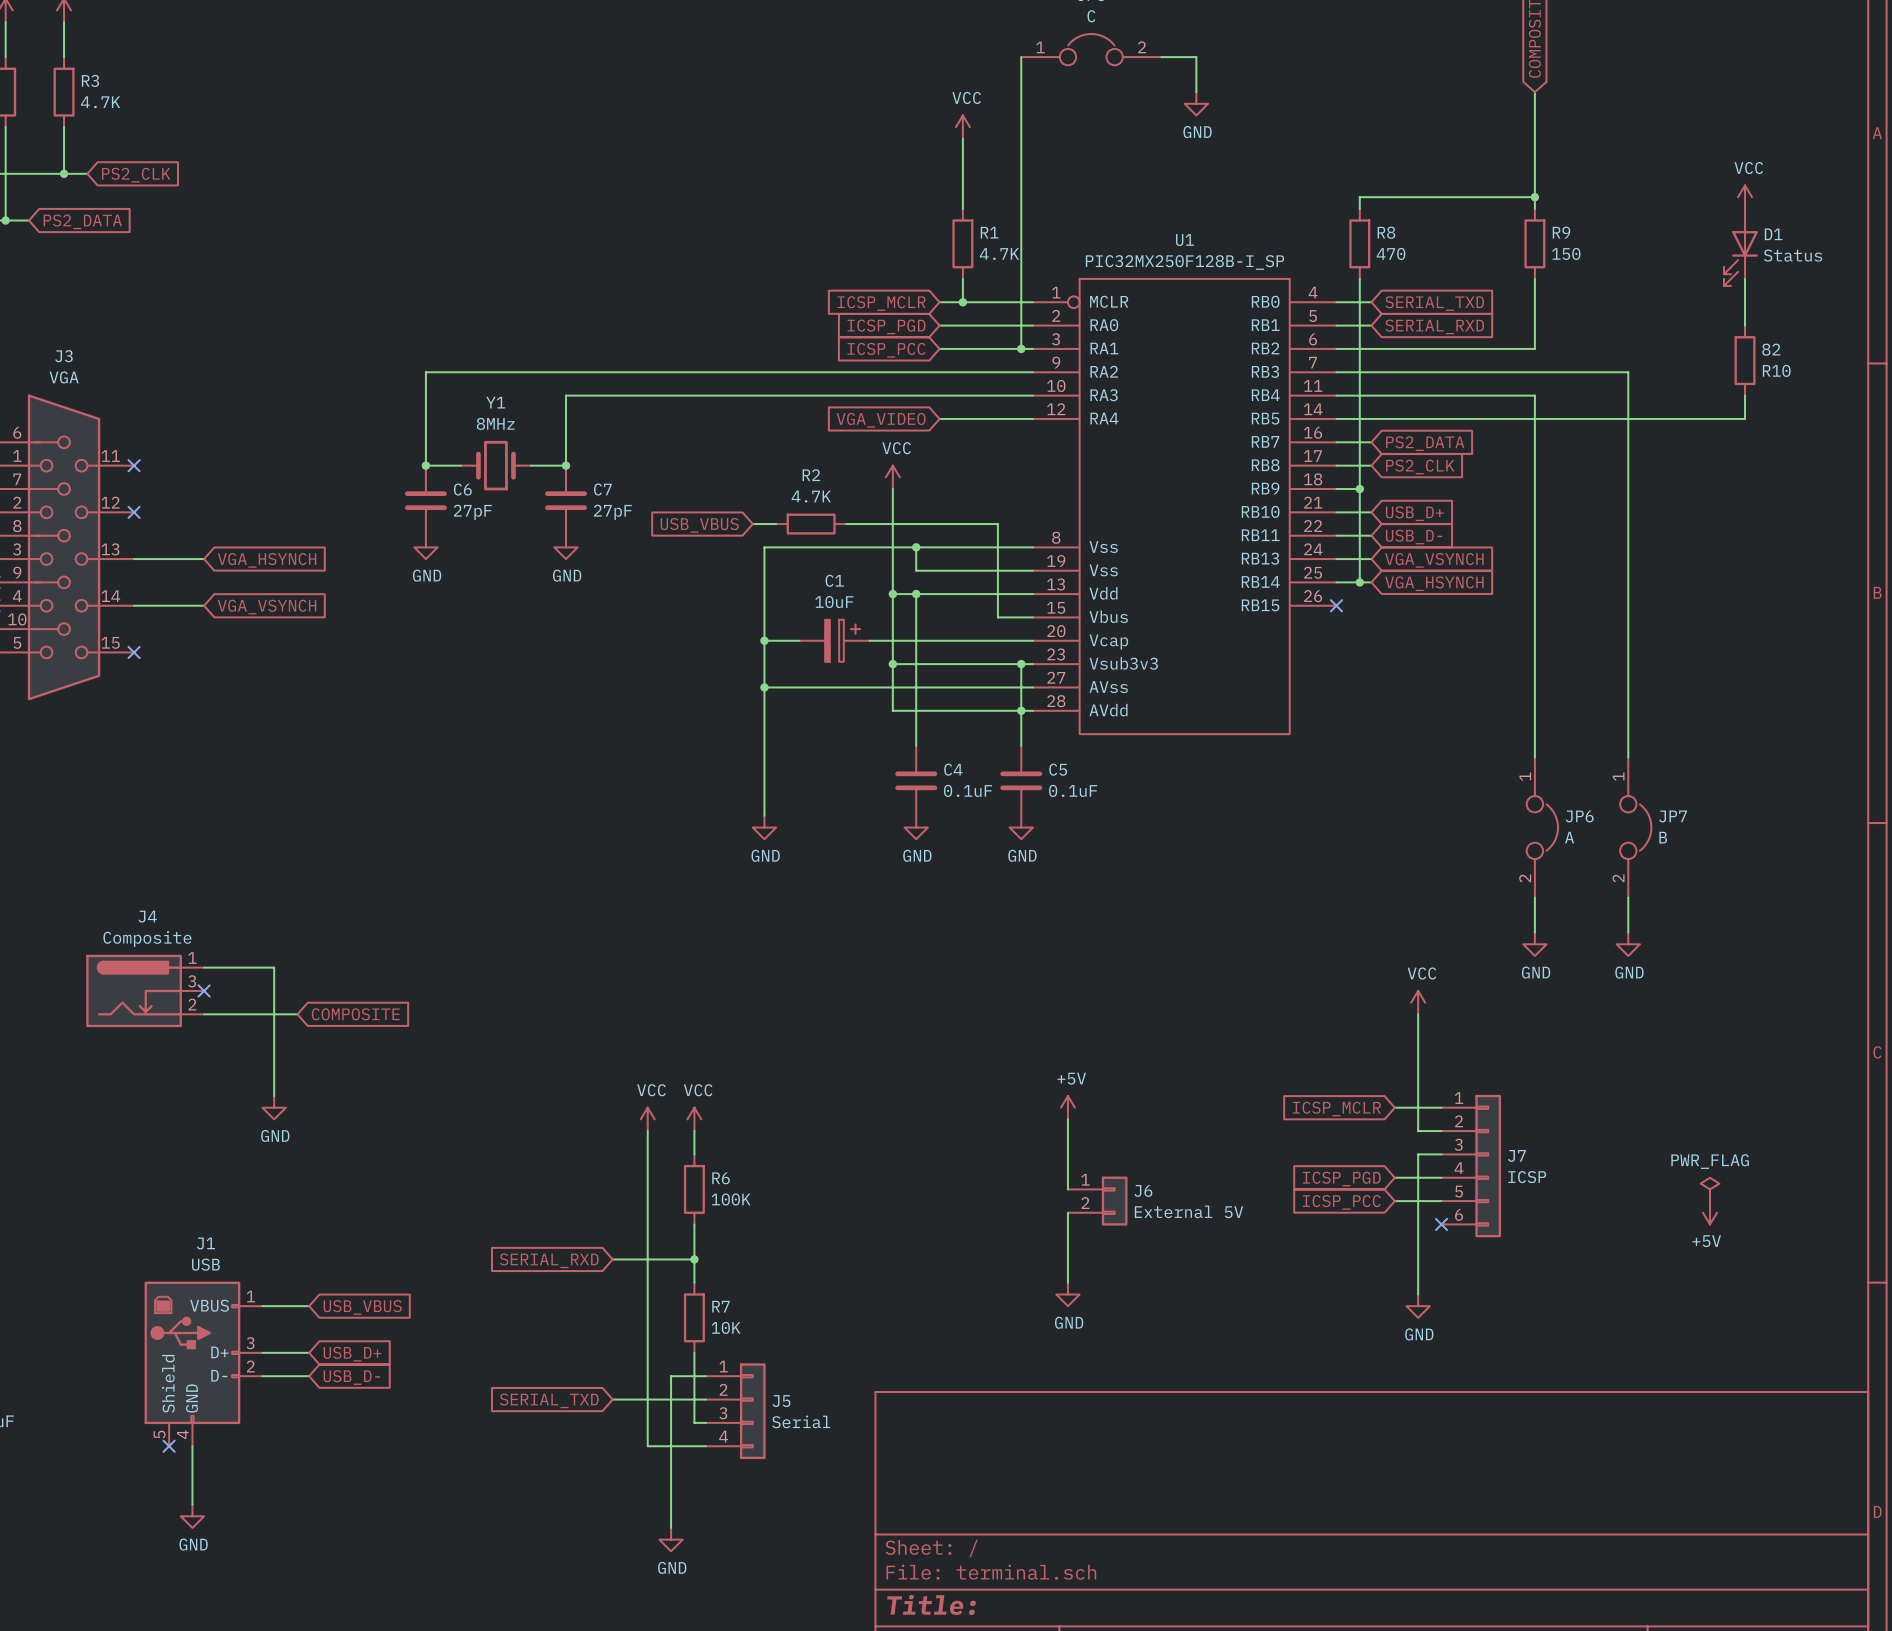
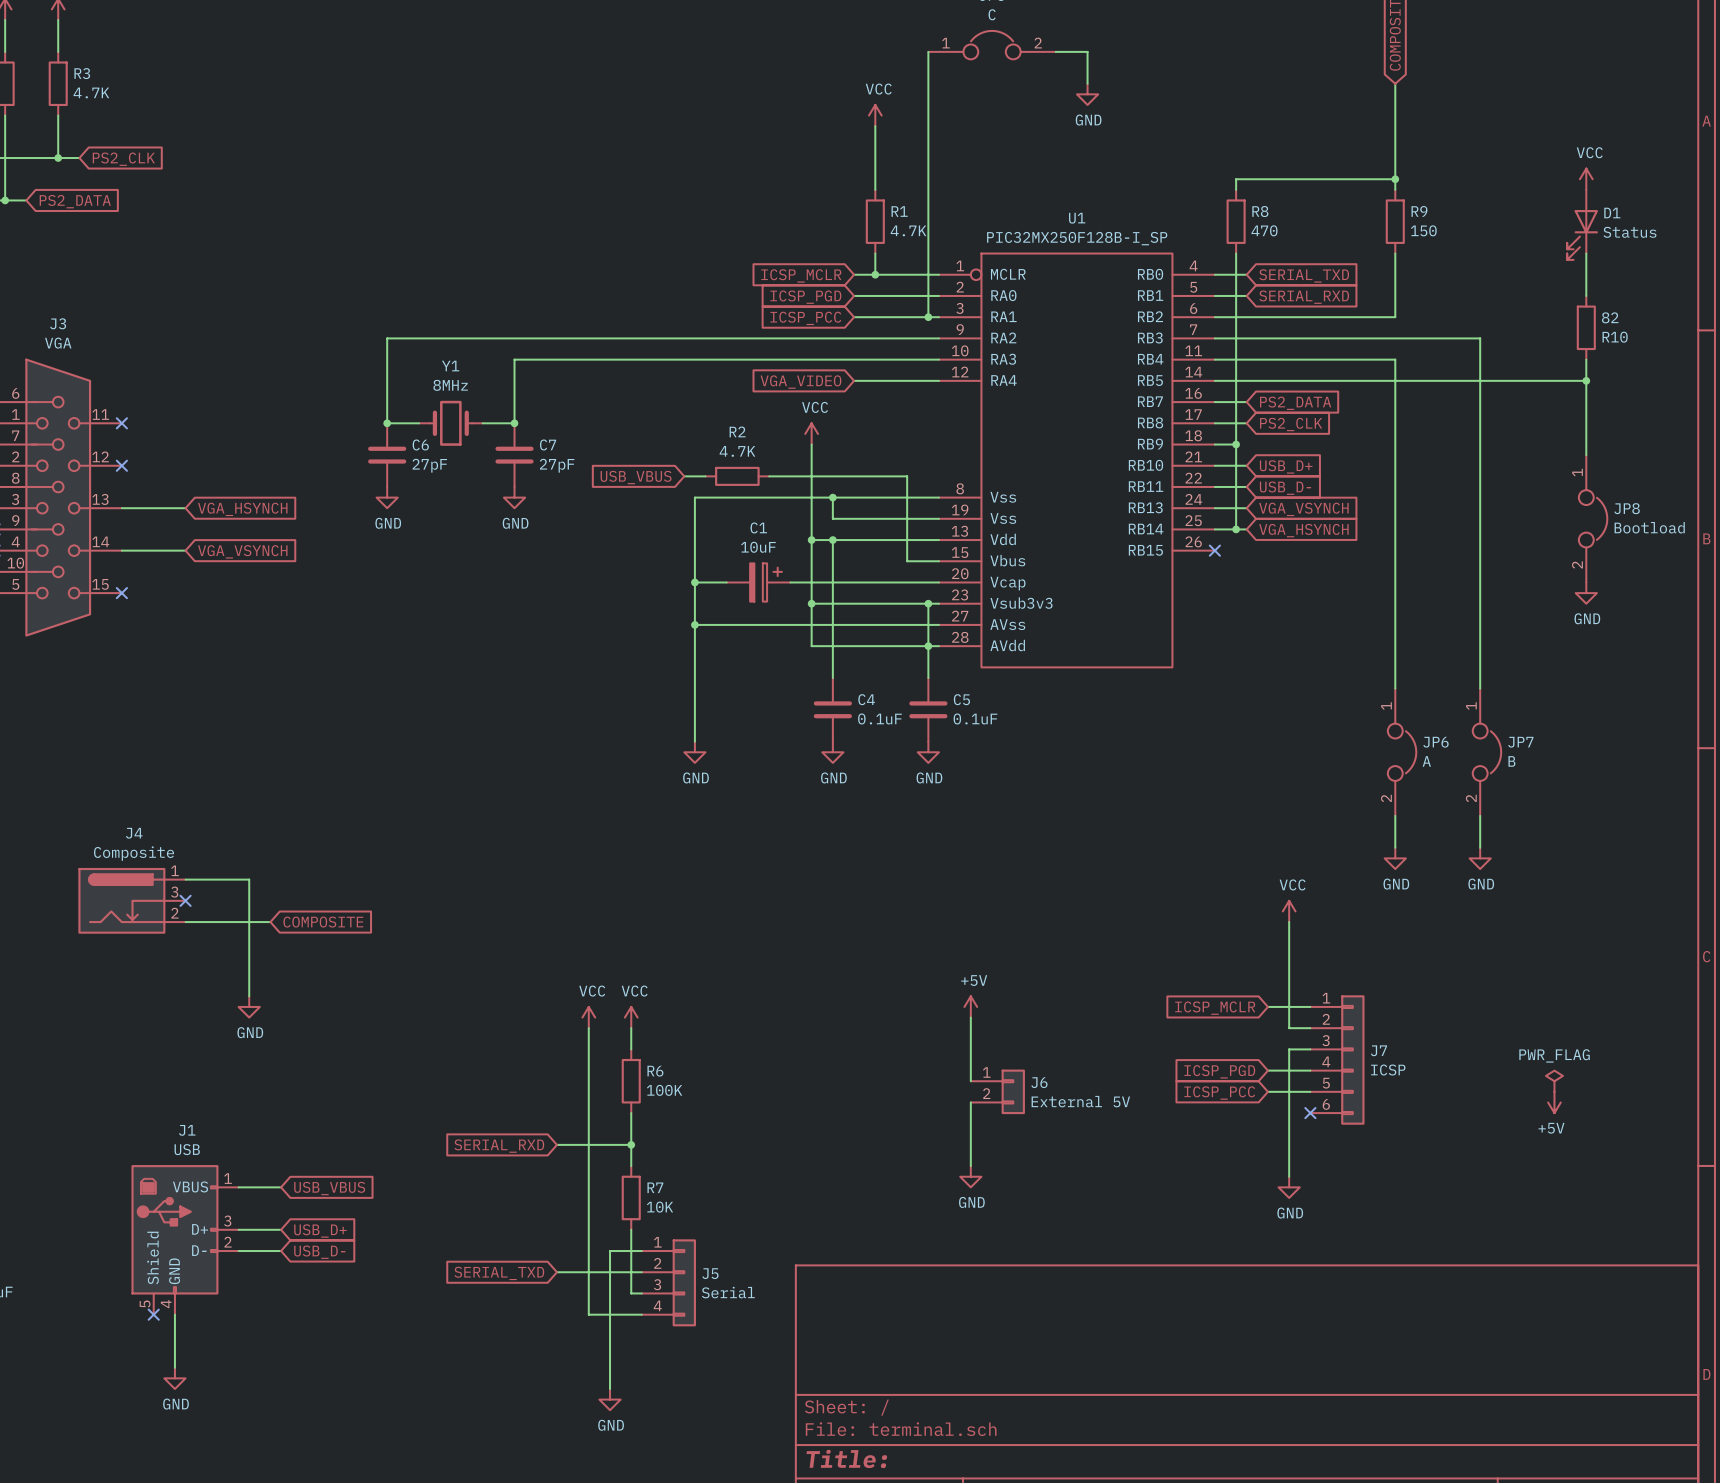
wire: none -> (1586, 380) (1586, 455)
junction: none -> (1586, 380)
JP8: none -> Bootload (1593, 518)
power symbol: none -> GND (1586, 593)

